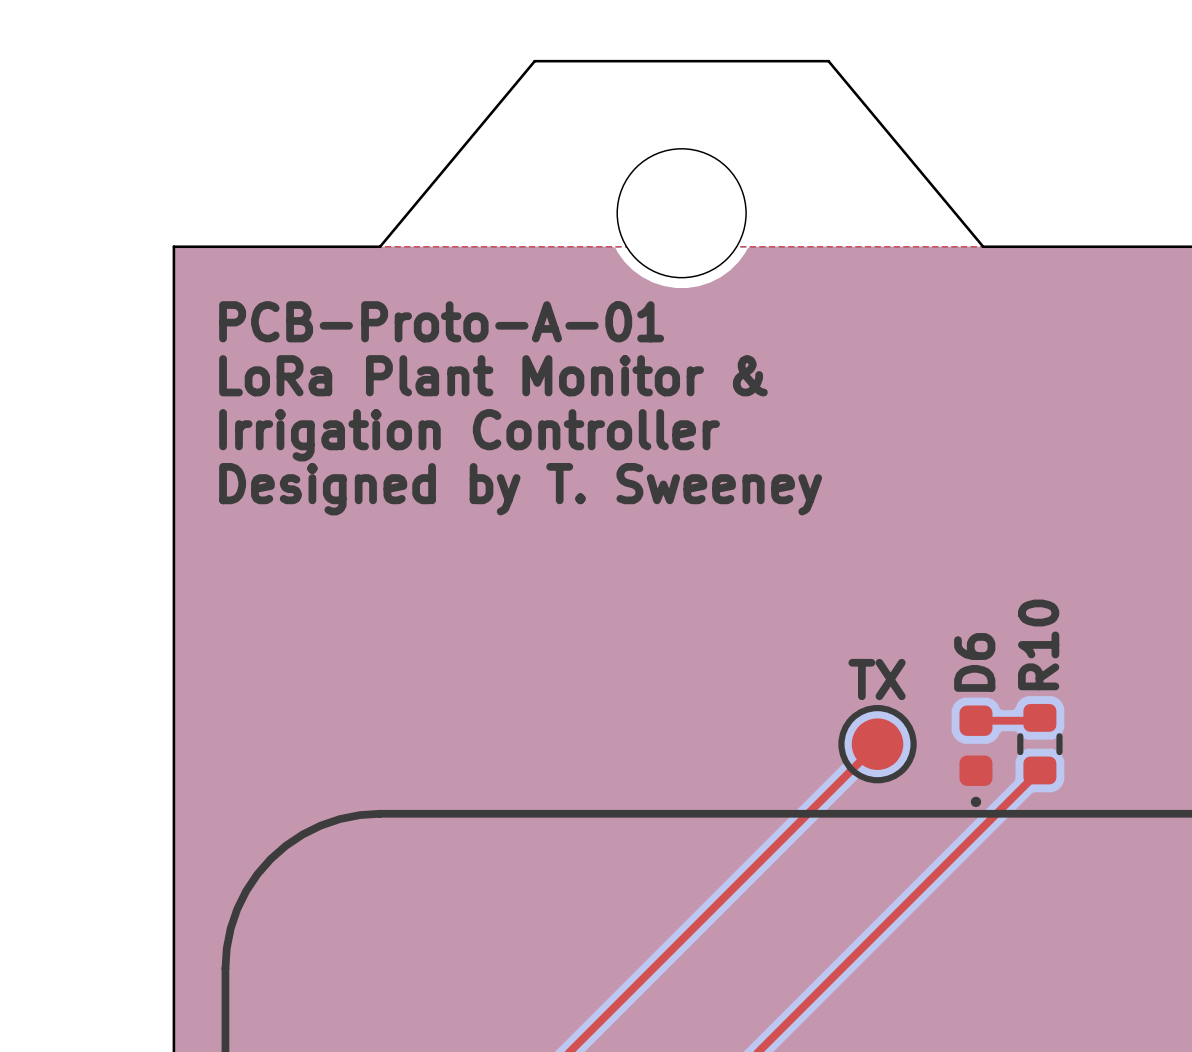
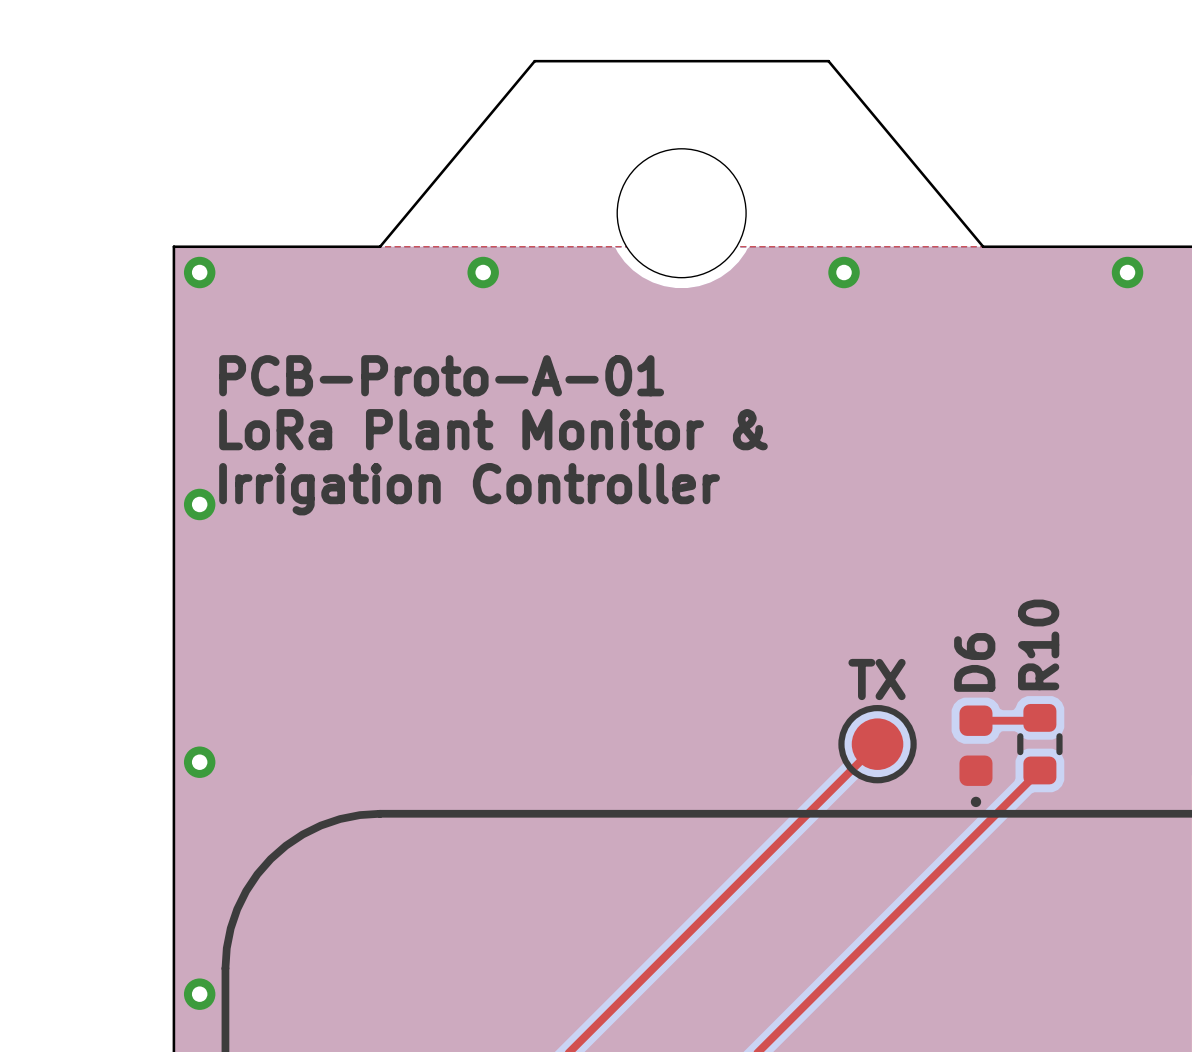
via: none -> (199, 272)
via: none -> (483, 272)
via: none -> (844, 272)
via: none -> (1127, 272)
text: PCB-Proto-A-01 (441, 321) -> none
text: LoRa Plant Monitor & (493, 375) -> PCB-Proto-A-01 (441, 375)
text: Irrigation Controller (469, 435) -> LoRa Plant Monitor & (493, 429)
text: Designed by T. Sweeney (520, 489) -> Irrigation Controller (469, 489)
via: none -> (199, 504)
via: none -> (199, 762)
via: none -> (199, 994)

